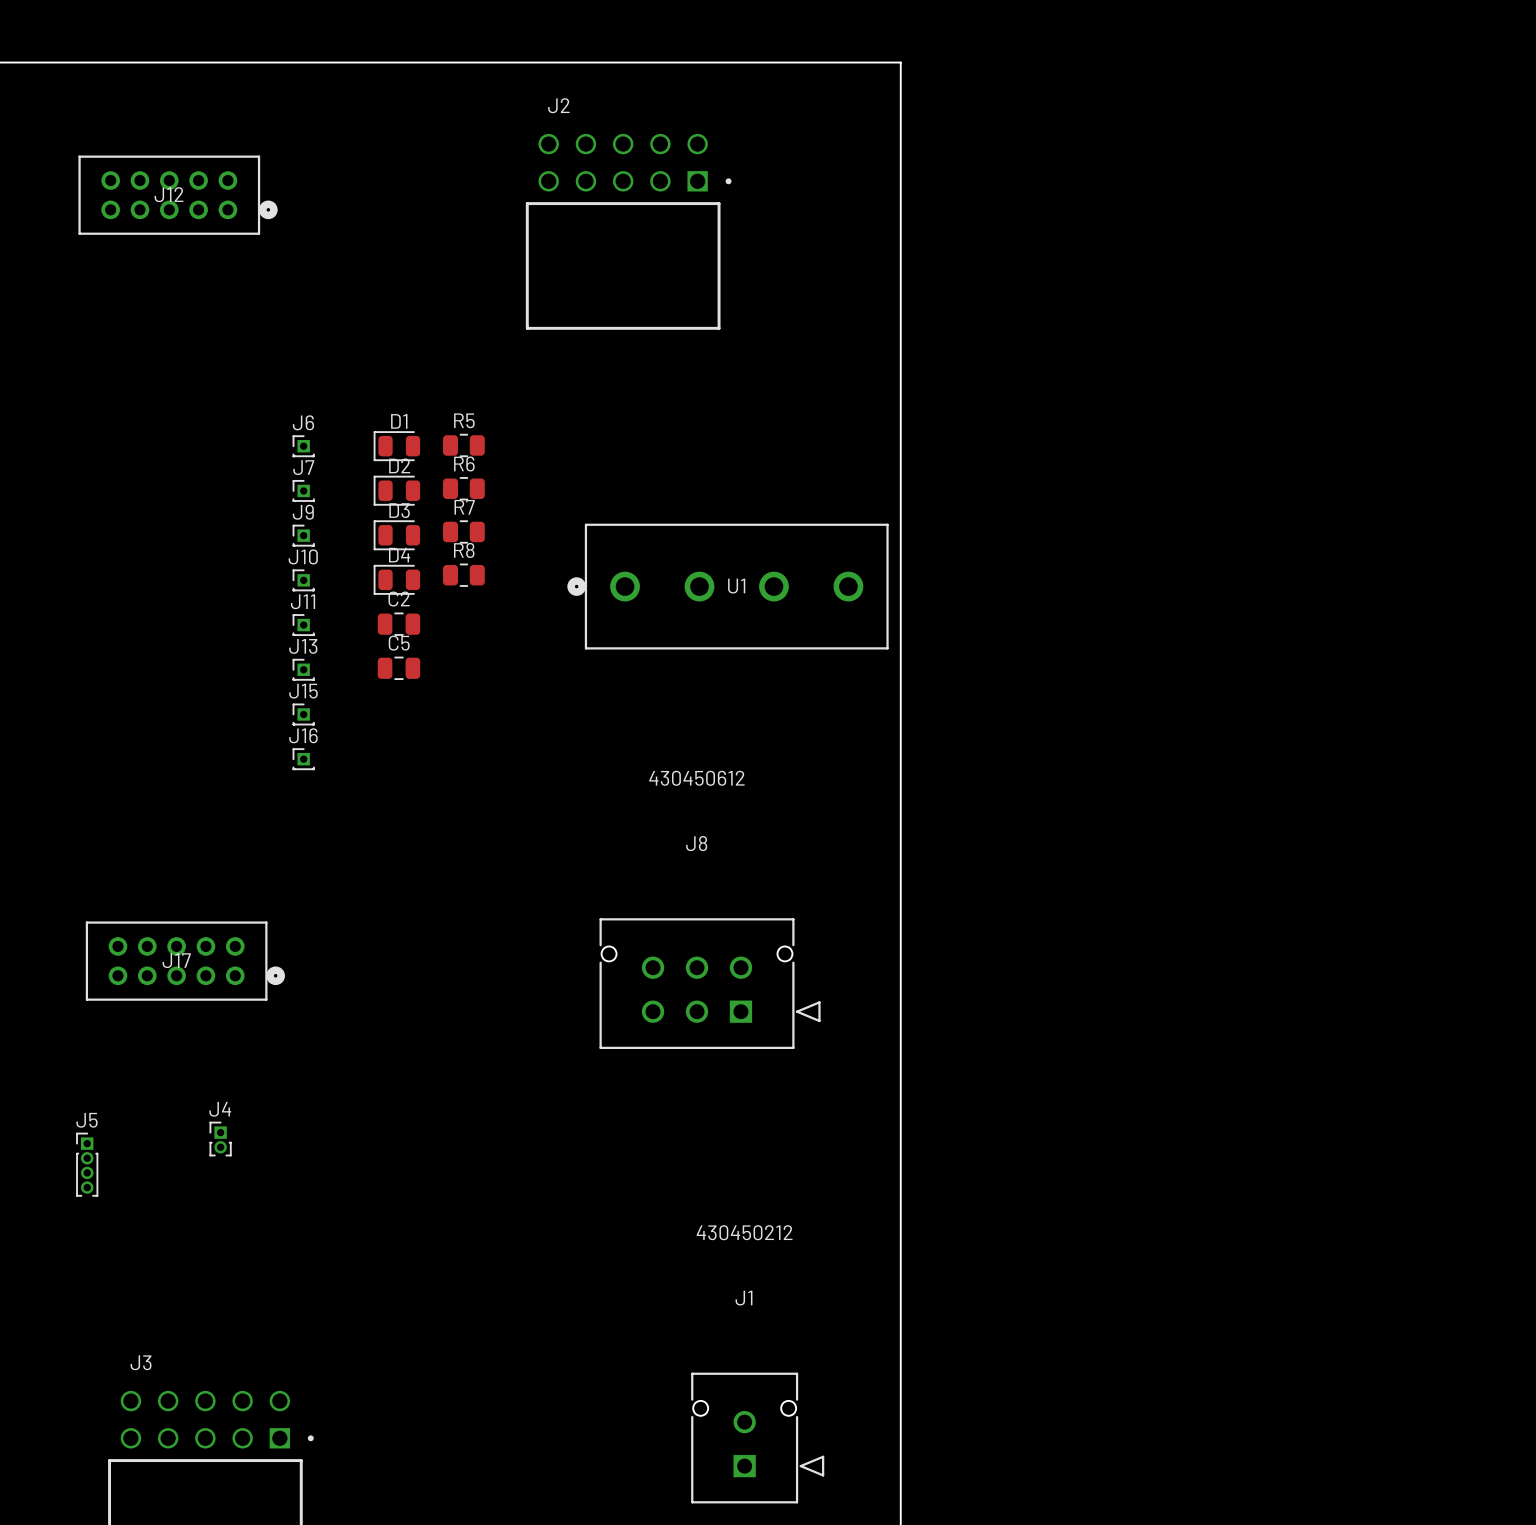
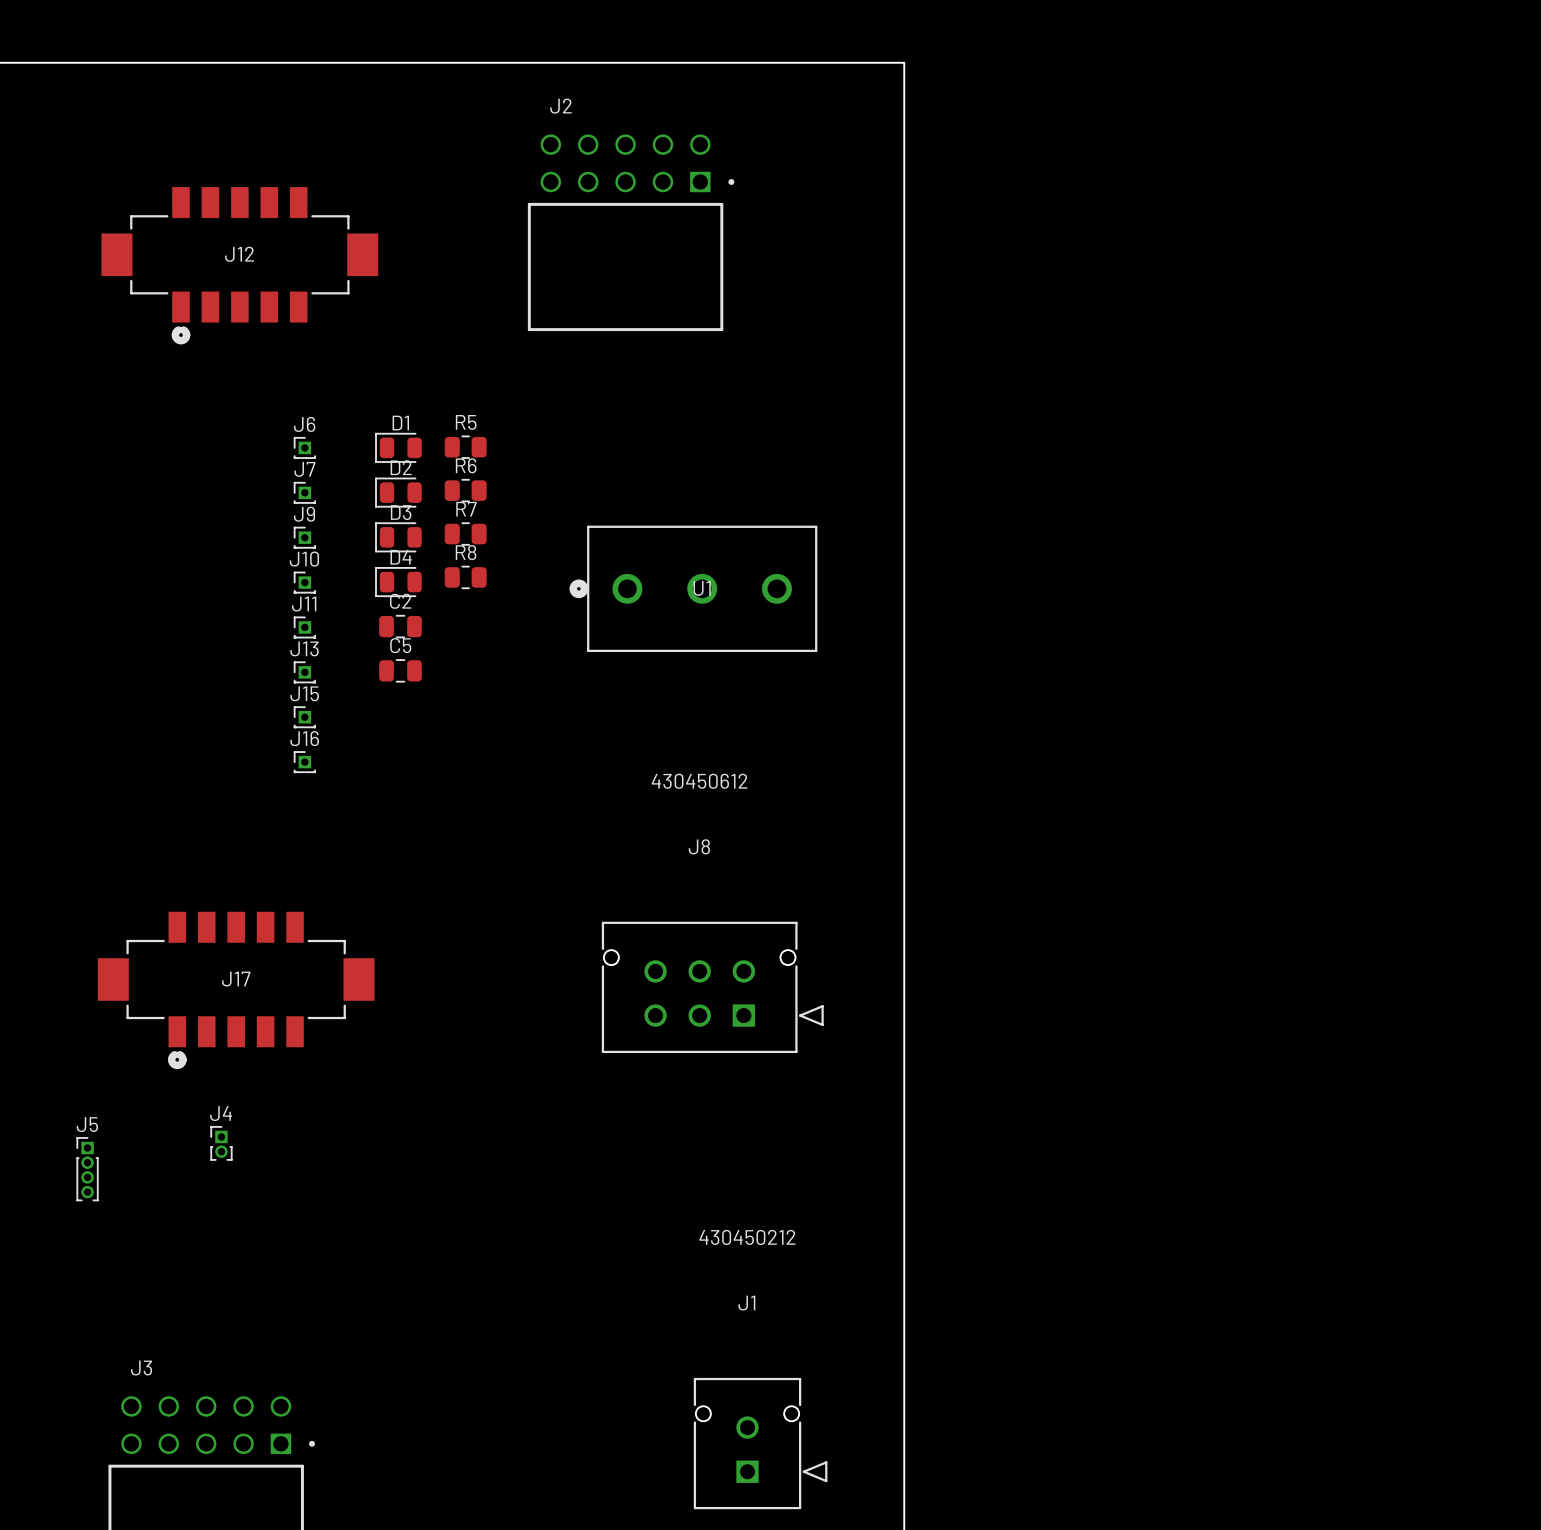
J12 footprint: [78, 155, 278, 235] -> [101, 187, 379, 345]
U1 footprint: [567, 523, 889, 650] -> [569, 525, 818, 653]
J17 footprint: [85, 921, 285, 1001] -> [97, 911, 375, 1070]

